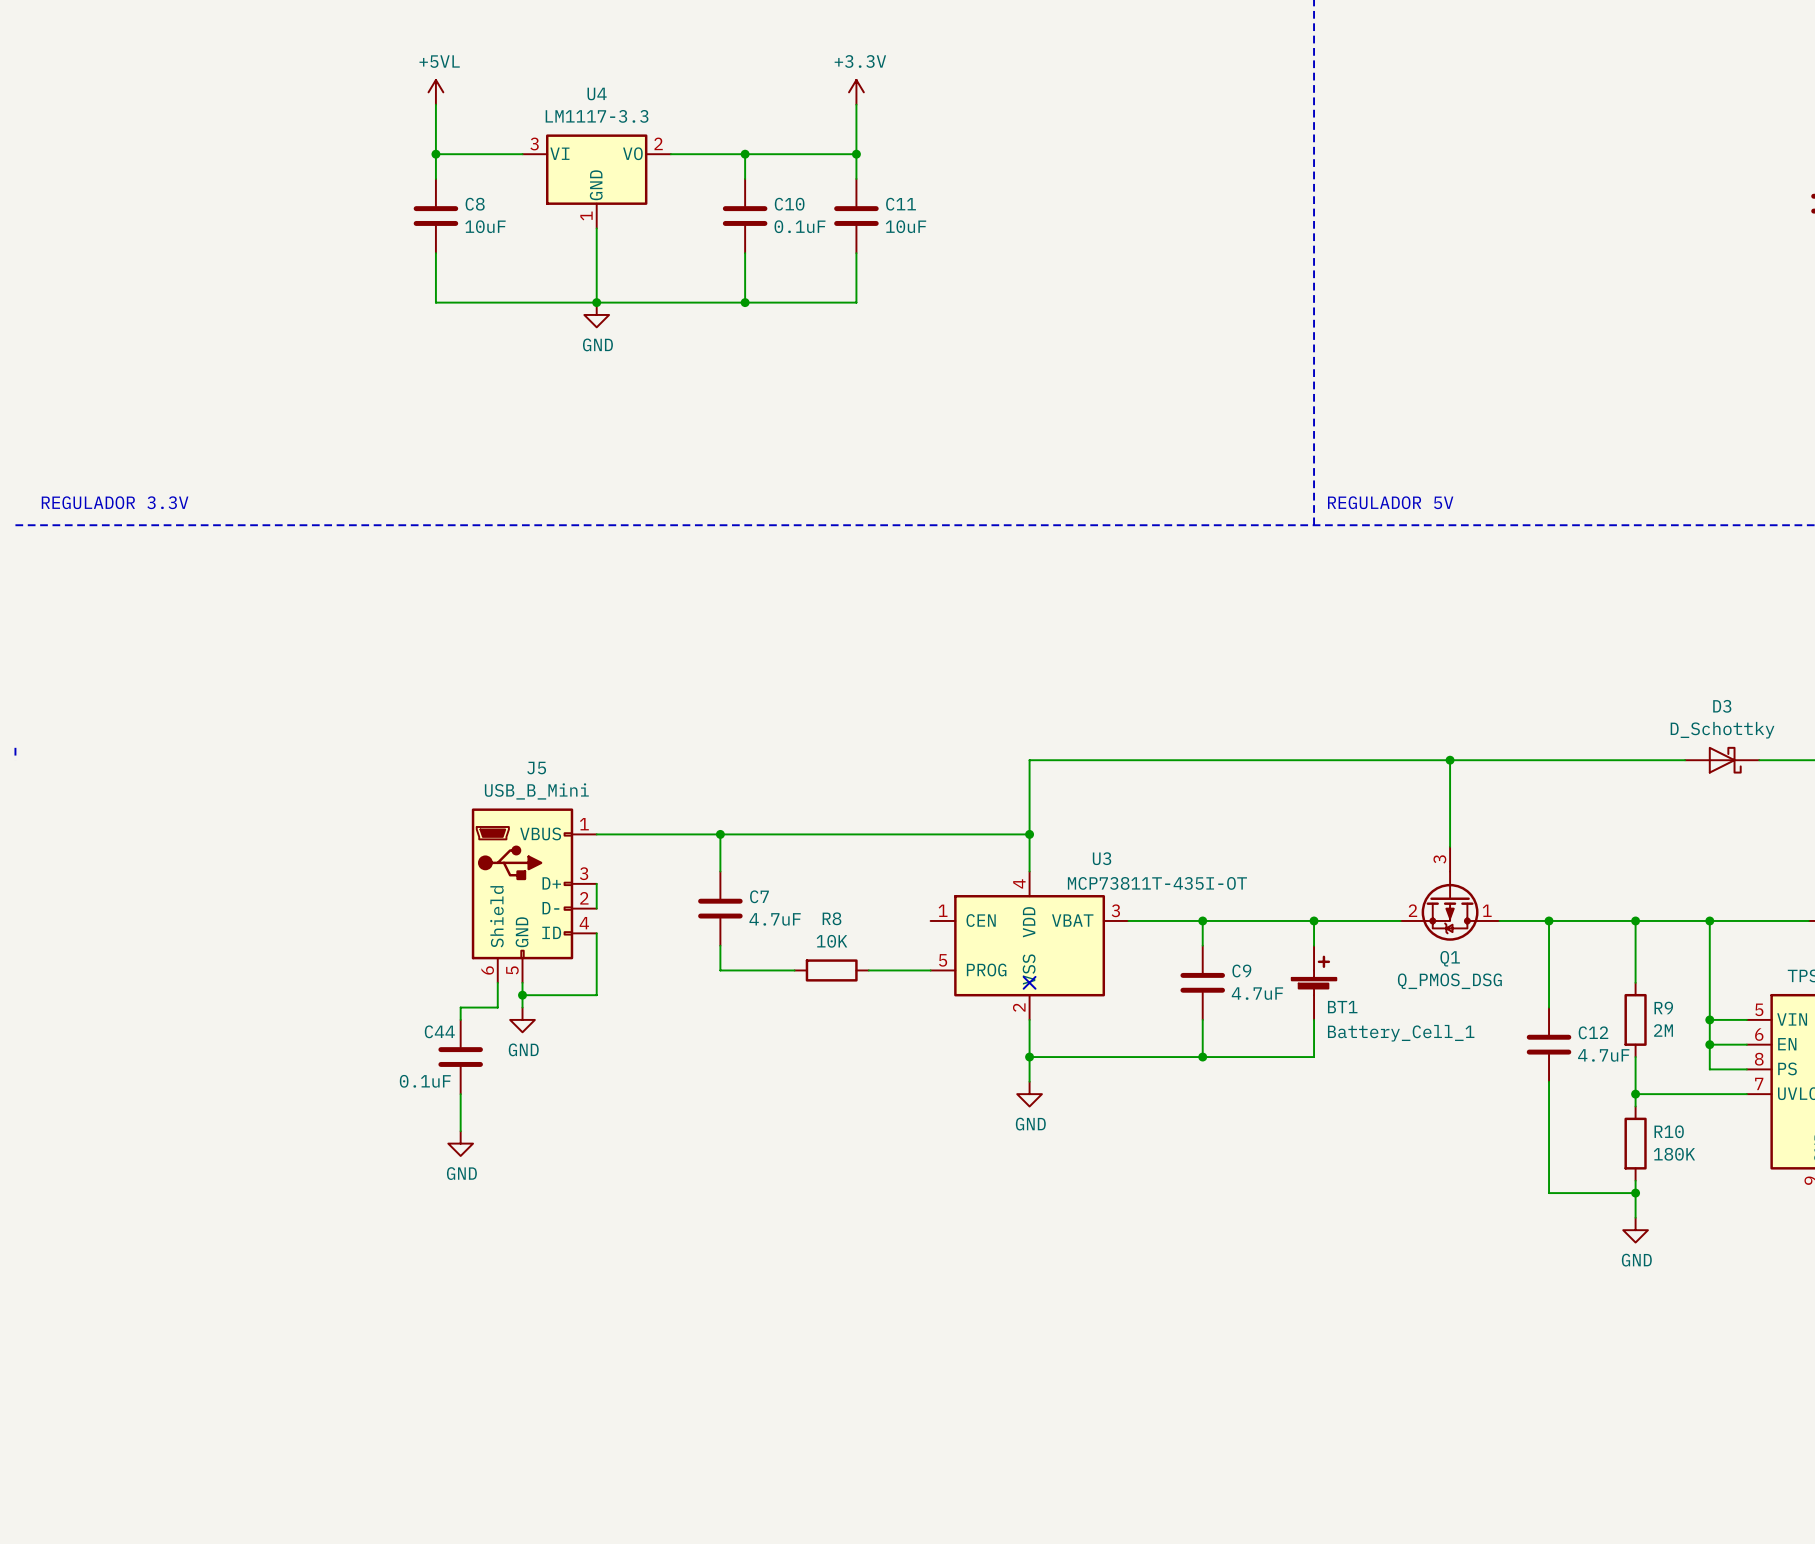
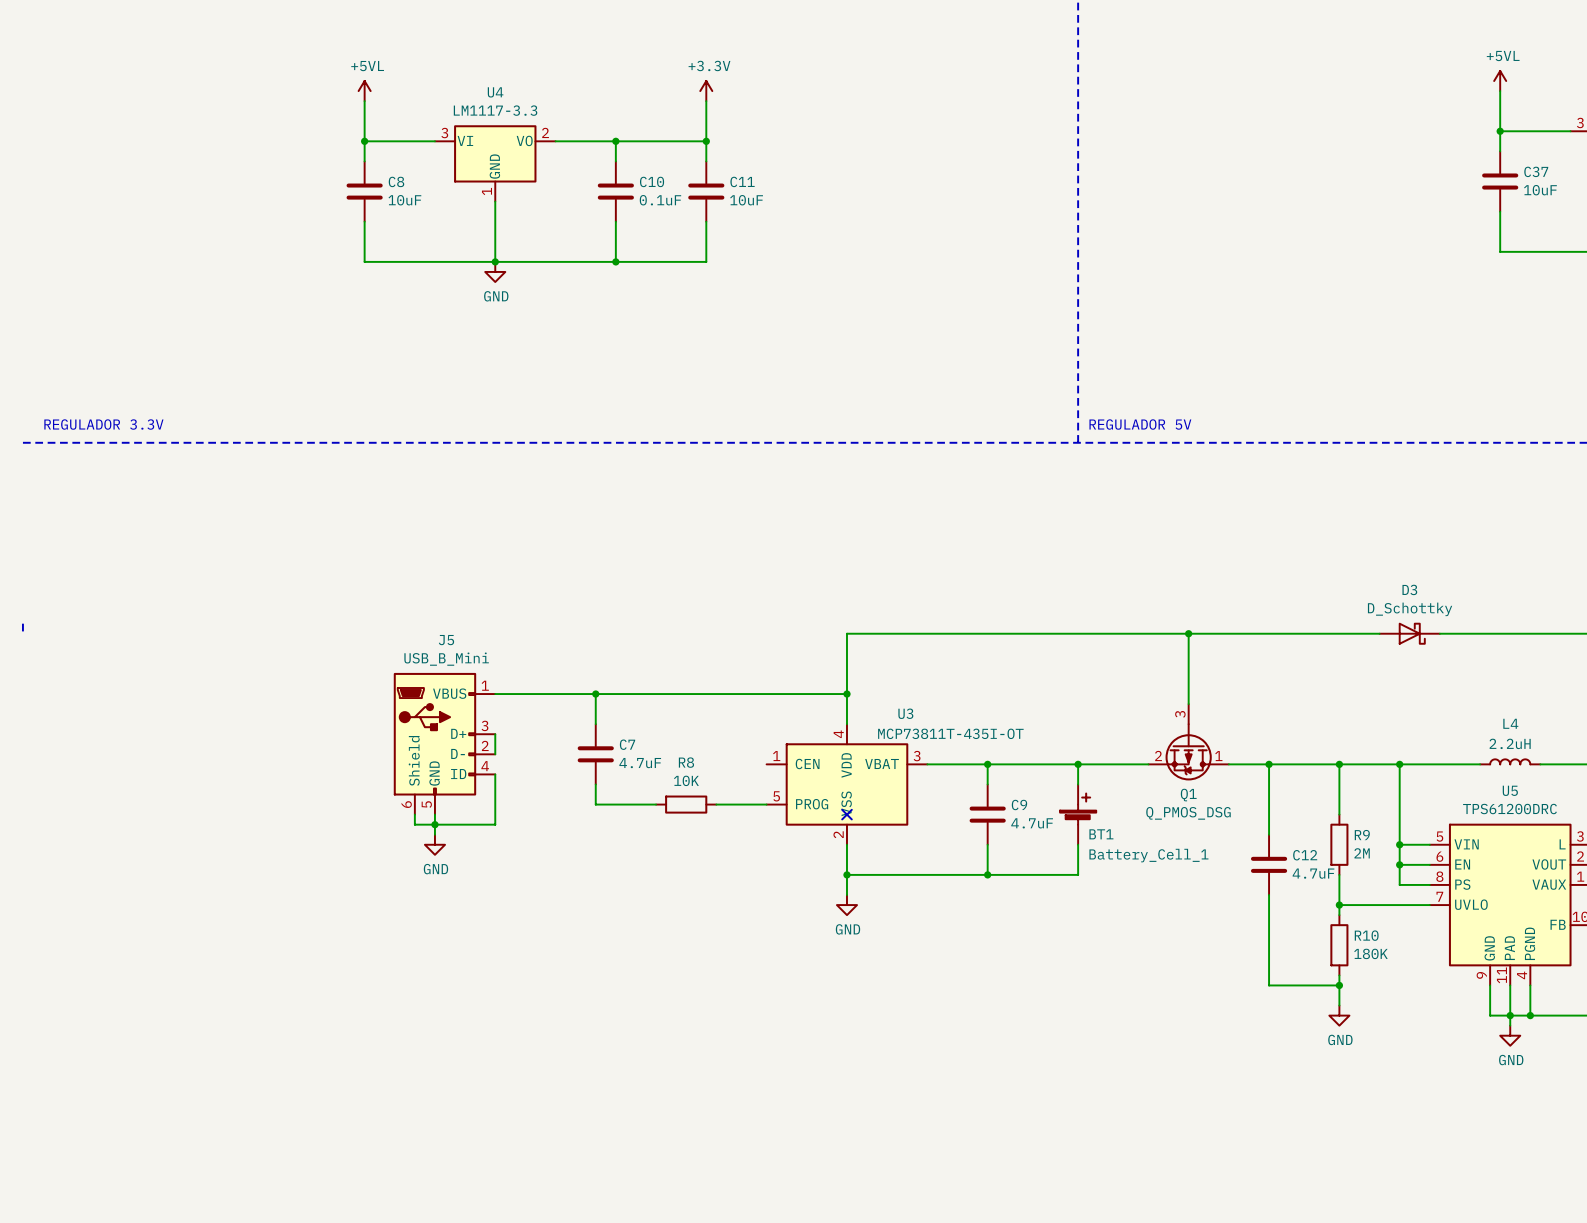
wire: (497, 995) (497, 1007) (460, 1007) (460, 1019) -> (414, 824) (434, 824)
C44: 0.1uF (460, 1057) -> none
wire: (460, 1094) (460, 1131) -> none
power symbol: GND (460, 1143) -> none

